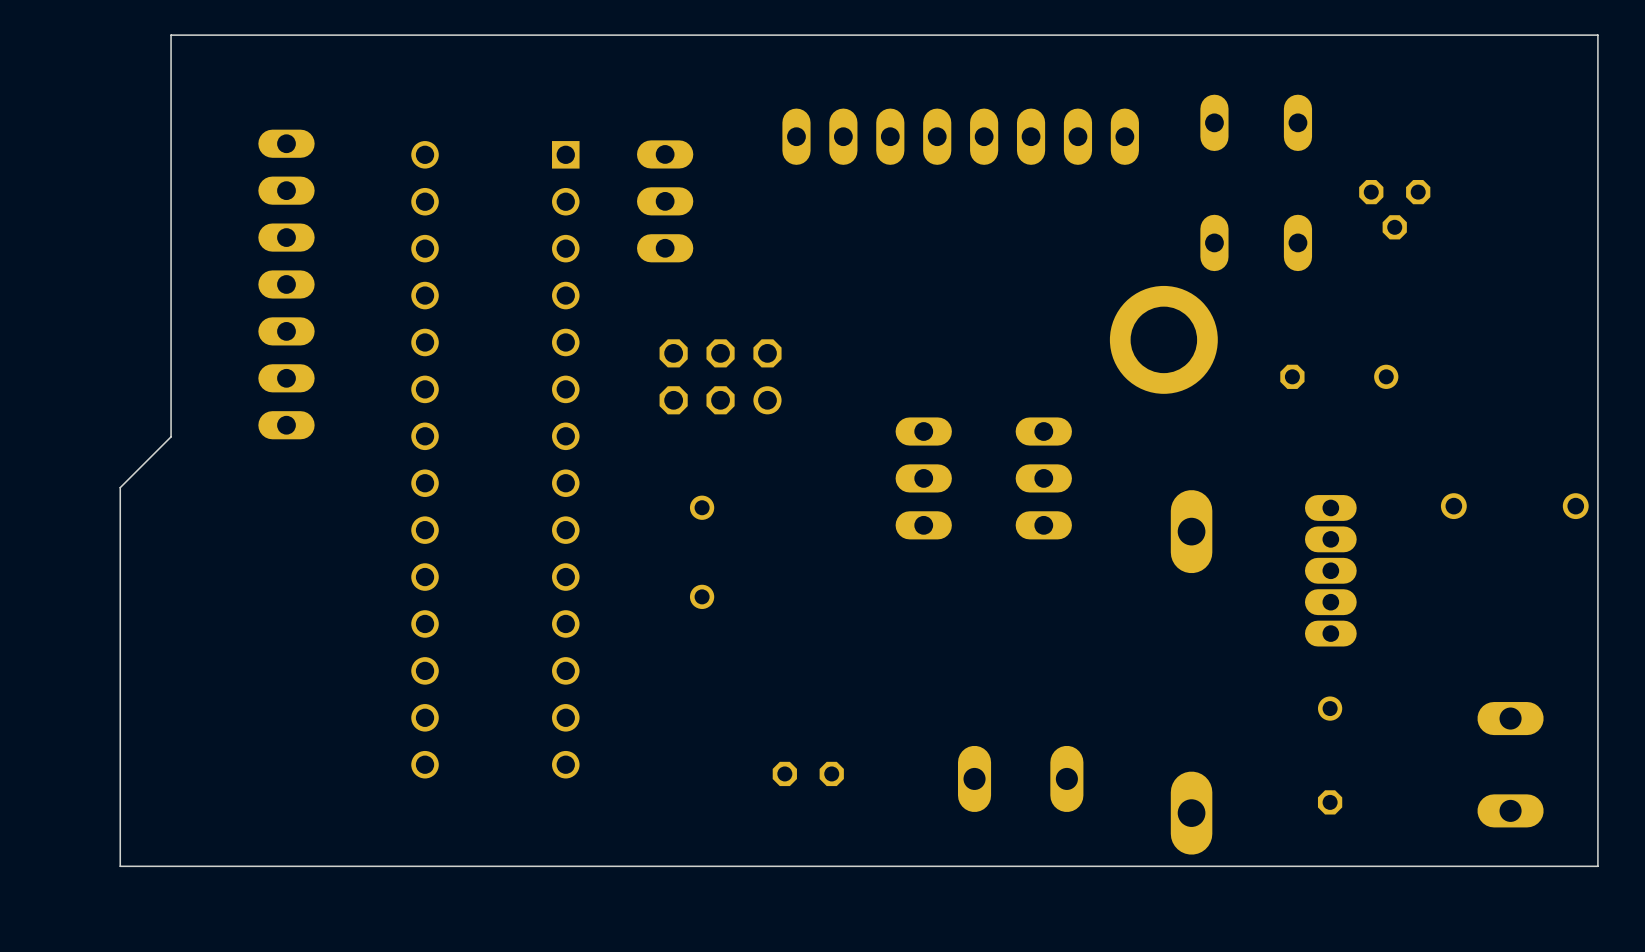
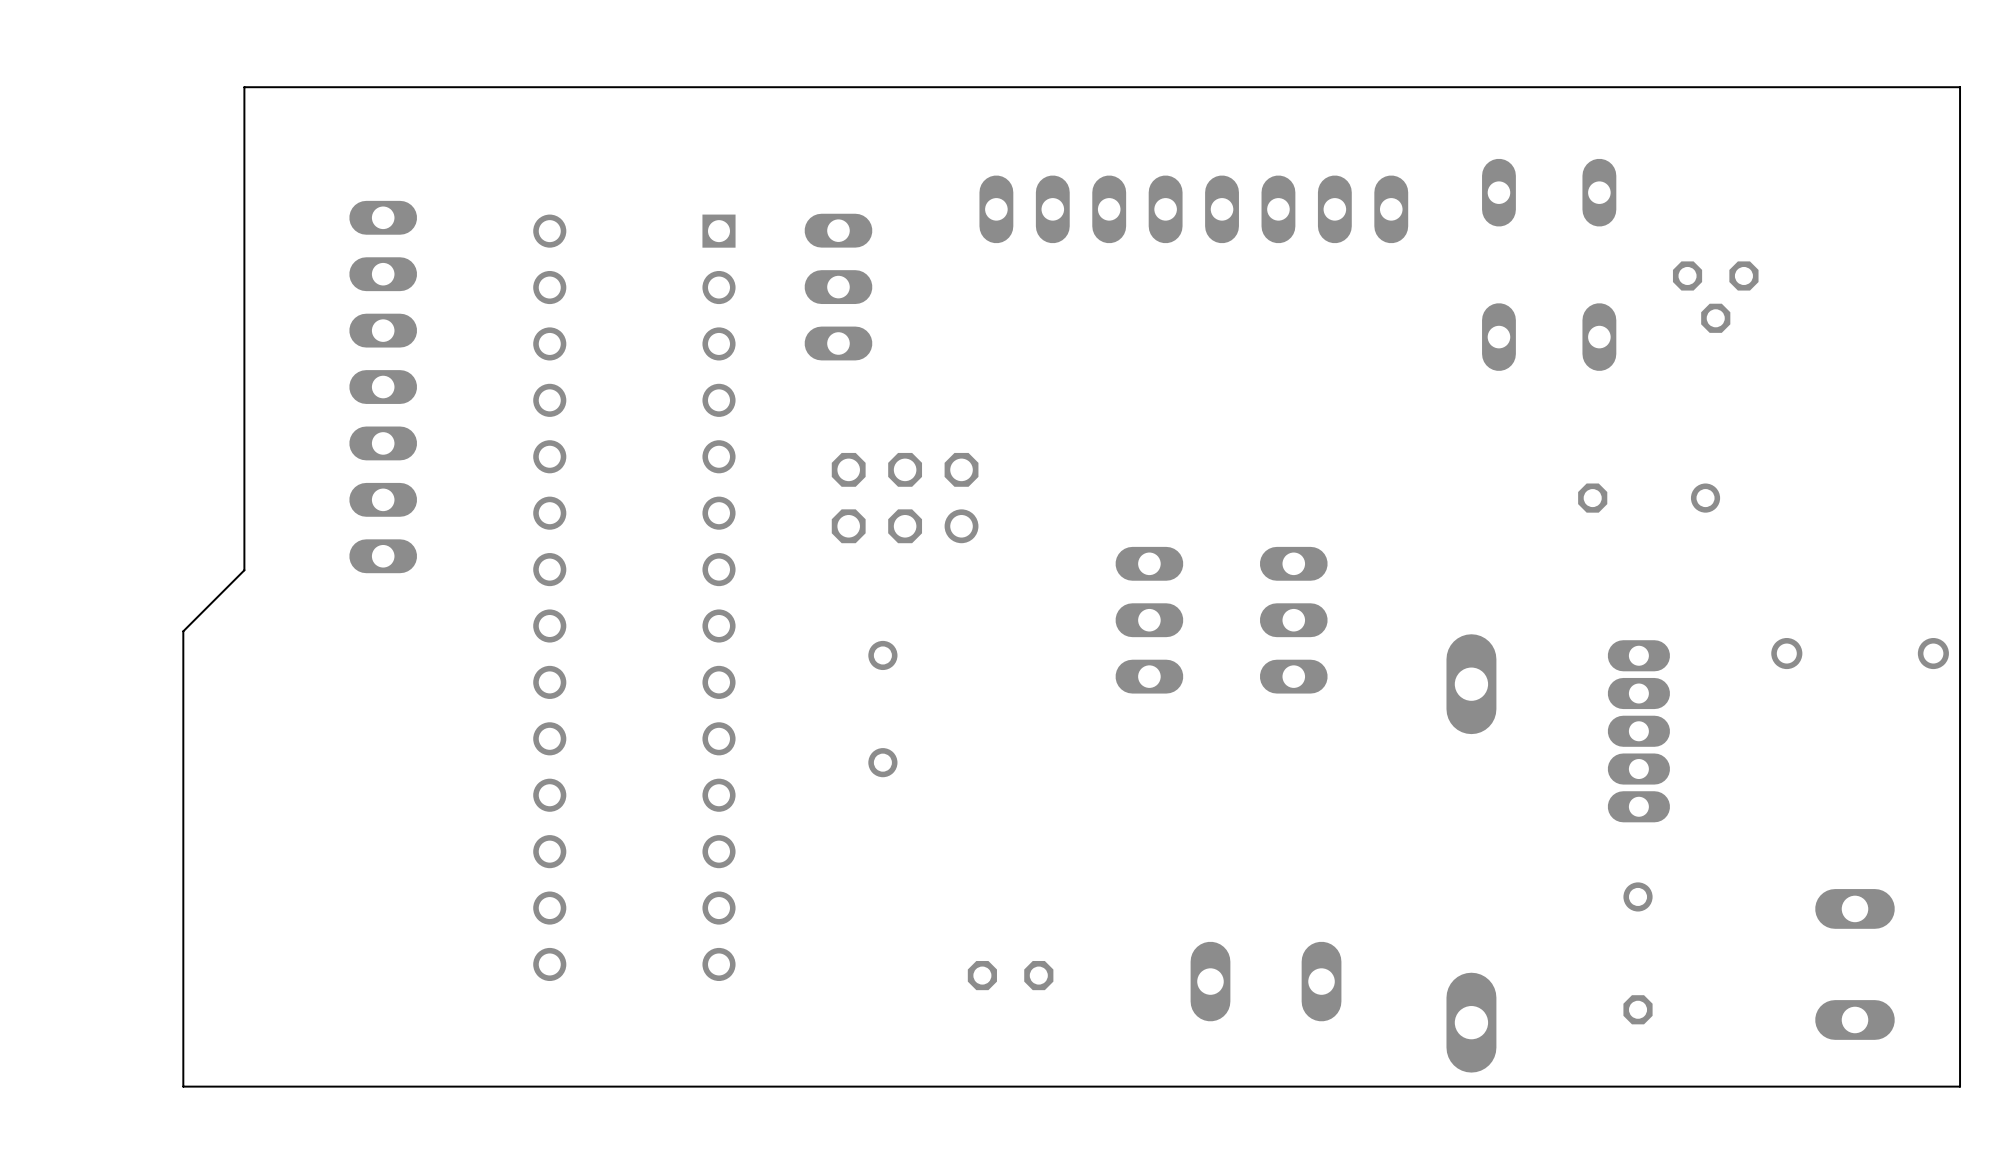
part: (1163, 339) -> none

